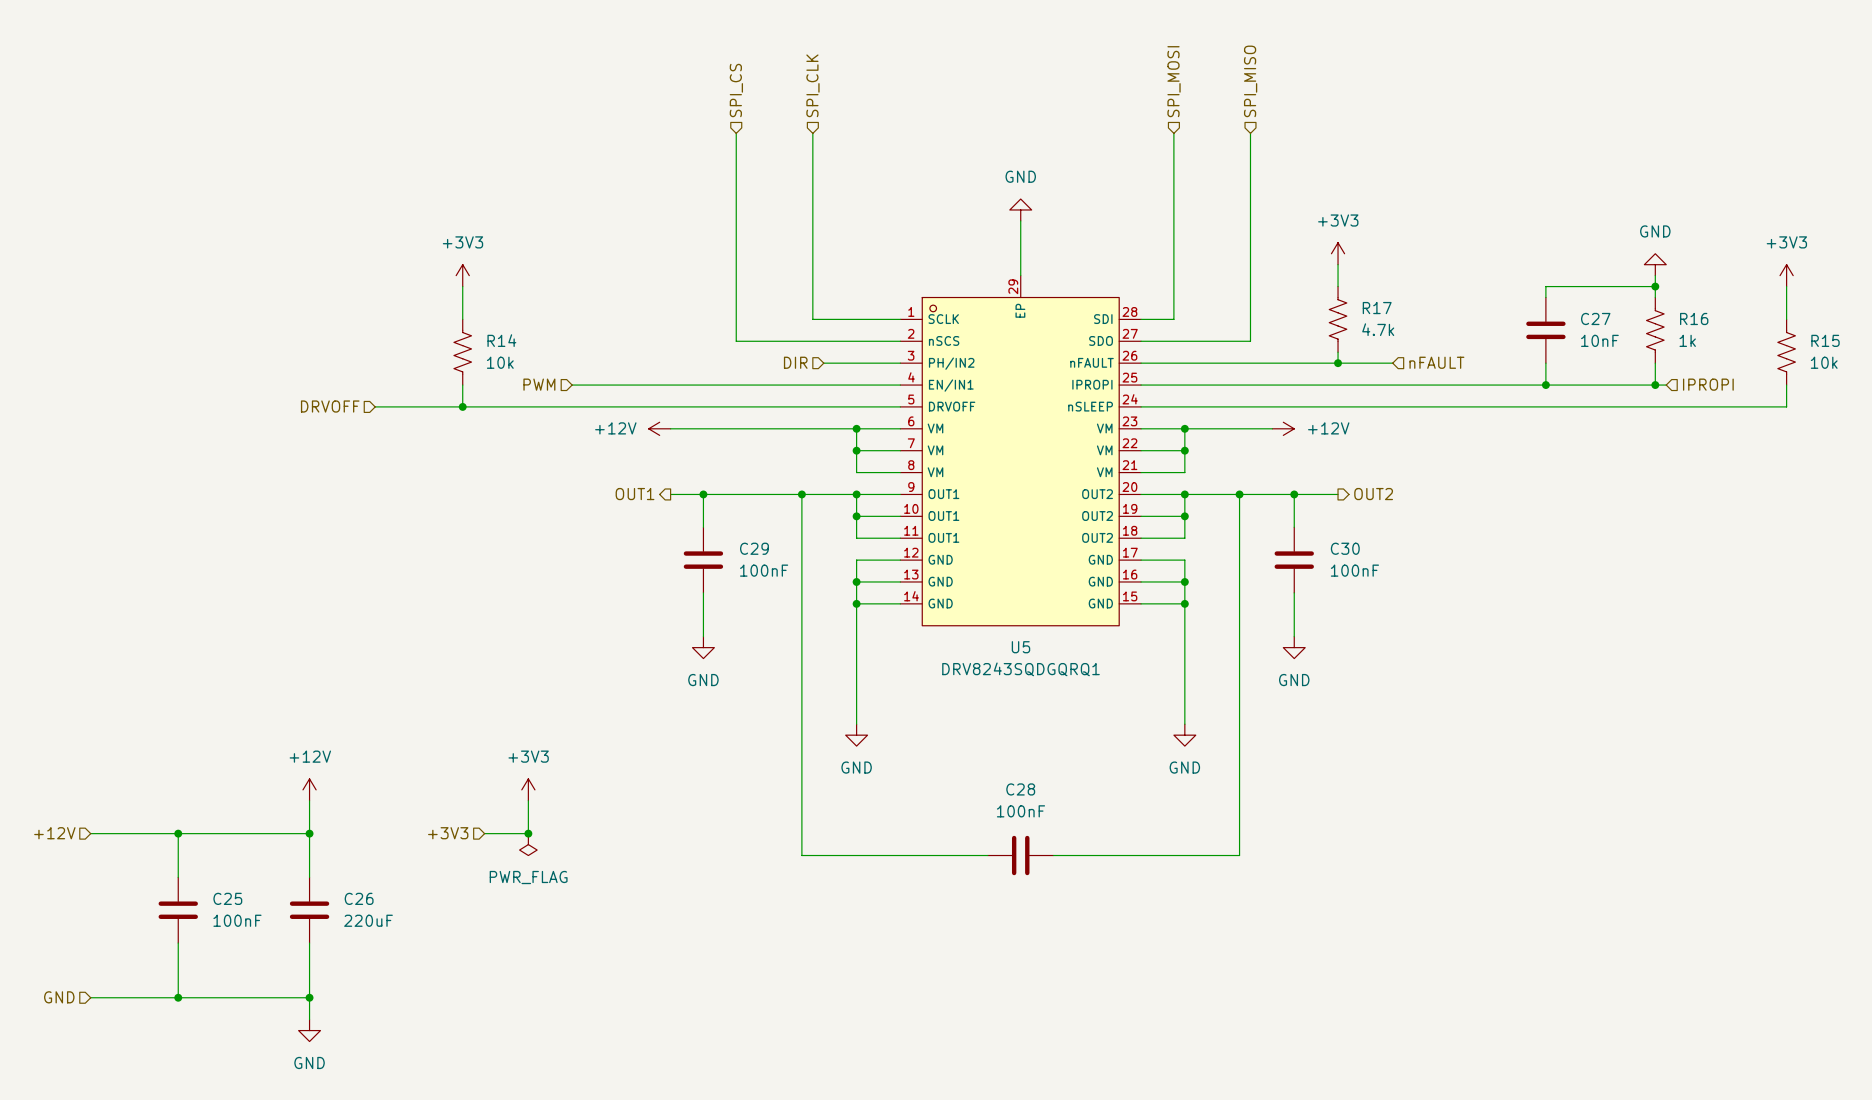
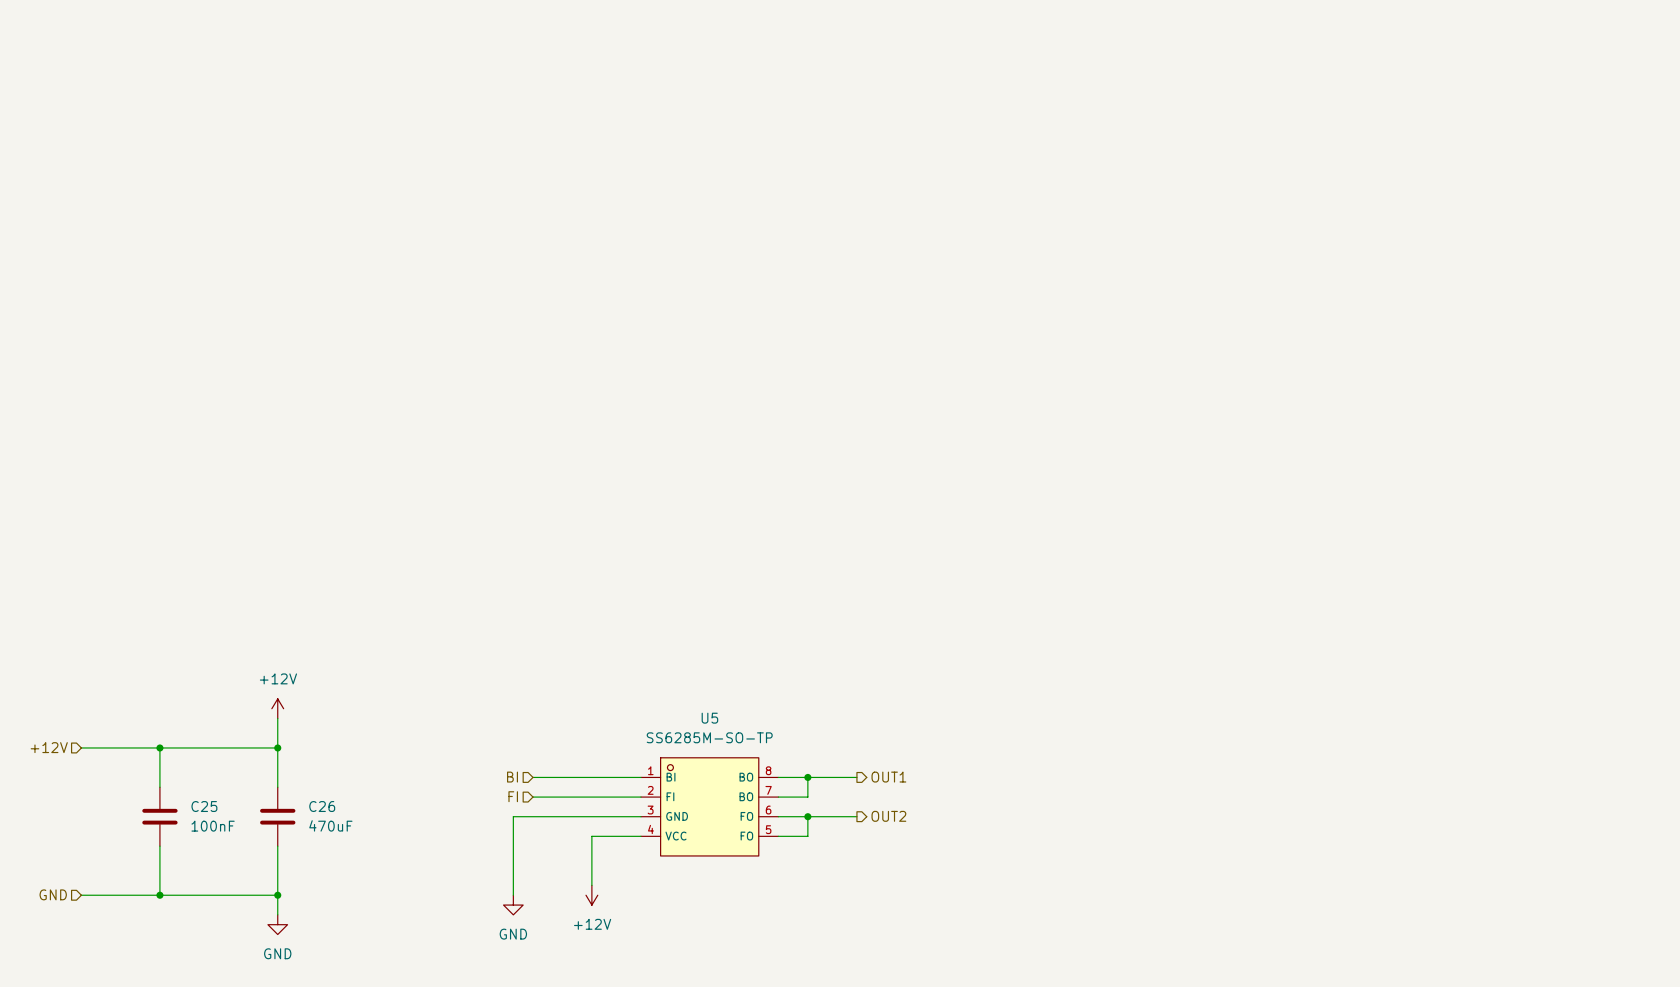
hierarchical label: SPI_MOSI (1174, 81) -> none
hierarchical label: SPI_MISO (1250, 81) -> none
hierarchical label: SPI_CLK (812, 85) -> none
hierarchical label: SPI_CS (736, 90) -> none
wire: (736, 133) (736, 341) (900, 341) -> none
wire: (812, 133) (812, 319) (900, 319) -> none
wire: (1173, 133) (1173, 319) (1141, 319) -> none
wire: (1250, 133) (1250, 341) (1141, 341) -> none
power symbol: GND (1020, 209) -> none
wire: (1020, 220) (1020, 275) -> none
power symbol: +3V3 (1338, 253) -> none
wire: (1338, 264) (1338, 286) -> none
power symbol: GND (1655, 264) -> none
power symbol: +3V3 (462, 275) -> none
U5 symbol: [900, 275, 1142, 626] -> [640, 757, 779, 856]
wire: (1655, 275) (1655, 297) -> none
power symbol: +3V3 (1786, 275) -> none
wire: (462, 286) (462, 319) -> none
wire: (1655, 286) (1545, 286) (1545, 297) -> none
junction: (1655, 286) -> none
wire: (1786, 286) (1786, 319) -> none
R17: 4.7k (1338, 319) -> none
C27: 10nF (1545, 330) -> none
R16: 1k (1655, 330) -> none
R14: 10k (462, 352) -> none
wire: (1338, 352) (1338, 363) -> none
R15: 10k (1786, 352) -> none
hierarchical label: DIR (795, 362) -> none
hierarchical label: nFAULT (1436, 362) -> none
wire: (823, 363) (900, 363) -> none
wire: (1141, 363) (1392, 363) -> none
junction: (1338, 363) -> none
wire: (1545, 363) (1545, 385) -> none
wire: (1655, 363) (1655, 385) -> none
hierarchical label: PWM (539, 384) -> none
hierarchical label: IPROPI (1708, 384) -> none
wire: (462, 385) (462, 406) -> none
wire: (572, 385) (900, 385) -> none
wire: (1141, 385) (1666, 385) -> none
junction: (1545, 385) -> none
junction: (1655, 385) -> none
wire: (1786, 385) (1786, 406) (1141, 406) -> none
hierarchical label: DRVOFF (330, 406) -> none
wire: (375, 406) (900, 406) -> none
junction: (462, 406) -> none
power symbol: +12V (659, 428) -> none
wire: (670, 428) (900, 428) -> none
wire: (856, 428) (856, 472) (900, 472) -> none
junction: (856, 428) -> none
wire: (1141, 428) (1272, 428) -> none
wire: (1184, 428) (1184, 472) (1141, 472) -> none
junction: (1184, 428) -> none
power symbol: +12V (1283, 428) -> none
wire: (856, 450) (900, 450) -> none
junction: (856, 450) -> none
wire: (1141, 450) (1184, 450) -> none
junction: (1184, 450) -> none
hierarchical label: OUT1 (635, 494) -> none
wire: (670, 494) (900, 494) -> none
wire: (703, 494) (703, 527) -> none
junction: (703, 494) -> none
wire: (801, 494) (801, 855) (987, 855) -> none
junction: (801, 494) -> none
wire: (856, 494) (856, 538) (900, 538) -> none
junction: (856, 494) -> none
wire: (1141, 494) (1338, 494) -> none
wire: (1184, 494) (1184, 538) (1141, 538) -> none
junction: (1184, 494) -> none
wire: (1239, 494) (1239, 855) (1053, 855) -> none
junction: (1239, 494) -> none
wire: (1294, 494) (1294, 527) -> none
junction: (1294, 494) -> none
hierarchical label: OUT2 (1373, 494) -> none
wire: (856, 516) (900, 516) -> none
junction: (856, 516) -> none
wire: (1141, 516) (1184, 516) -> none
junction: (1184, 516) -> none
C29: 100nF (703, 560) -> none
wire: (900, 560) (856, 560) (856, 724) -> none
wire: (1141, 560) (1184, 560) (1184, 724) -> none
C30: 100nF (1294, 560) -> none
wire: (856, 581) (900, 581) -> none
junction: (856, 581) -> none
wire: (1141, 581) (1184, 581) -> none
junction: (1184, 581) -> none
wire: (703, 592) (703, 636) -> none
wire: (1294, 592) (1294, 636) -> none
wire: (856, 603) (900, 603) -> none
junction: (856, 603) -> none
wire: (1141, 603) (1184, 603) -> none
junction: (1184, 603) -> none
power symbol: GND (703, 647) -> none
U5 name position: U5 (1020, 647) -> U5 (709, 718)
power symbol: GND (1294, 647) -> none
U5 value: DRV8243SQDGQRQ1 (1020, 669) -> SS6285M-SO-TP (709, 737)
power symbol: GND (856, 735) -> none
power symbol: GND (1184, 735) -> none
power symbol: +3V3 (528, 789) -> none
wire: (528, 800) (528, 833) (484, 833) -> none
hierarchical label: +3V3 (448, 833) -> none
junction: (528, 833) -> none
power symbol: PWR_FLAG (528, 844) -> none
C28: 100nF (1020, 855) -> none
hierarchical label: none -> BI (512, 777)
wire: none -> (532, 777) (640, 777)
wire: none -> (778, 777) (856, 777)
wire: none -> (807, 777) (807, 797) (778, 797)
junction: none -> (807, 777)
hierarchical label: none -> OUT1 (888, 777)
hierarchical label: none -> FI (513, 796)
wire: none -> (532, 797) (640, 797)
hierarchical label: none -> OUT2 (888, 816)
wire: none -> (640, 816) (513, 816) (513, 895)
wire: none -> (778, 816) (856, 816)
wire: none -> (807, 816) (807, 836) (778, 836)
junction: none -> (807, 816)
C26 value: 220uF (368, 920) -> 470uF (330, 825)
wire: none -> (640, 836) (591, 836) (591, 885)
power symbol: none -> +12V (591, 895)
power symbol: none -> GND (513, 905)

